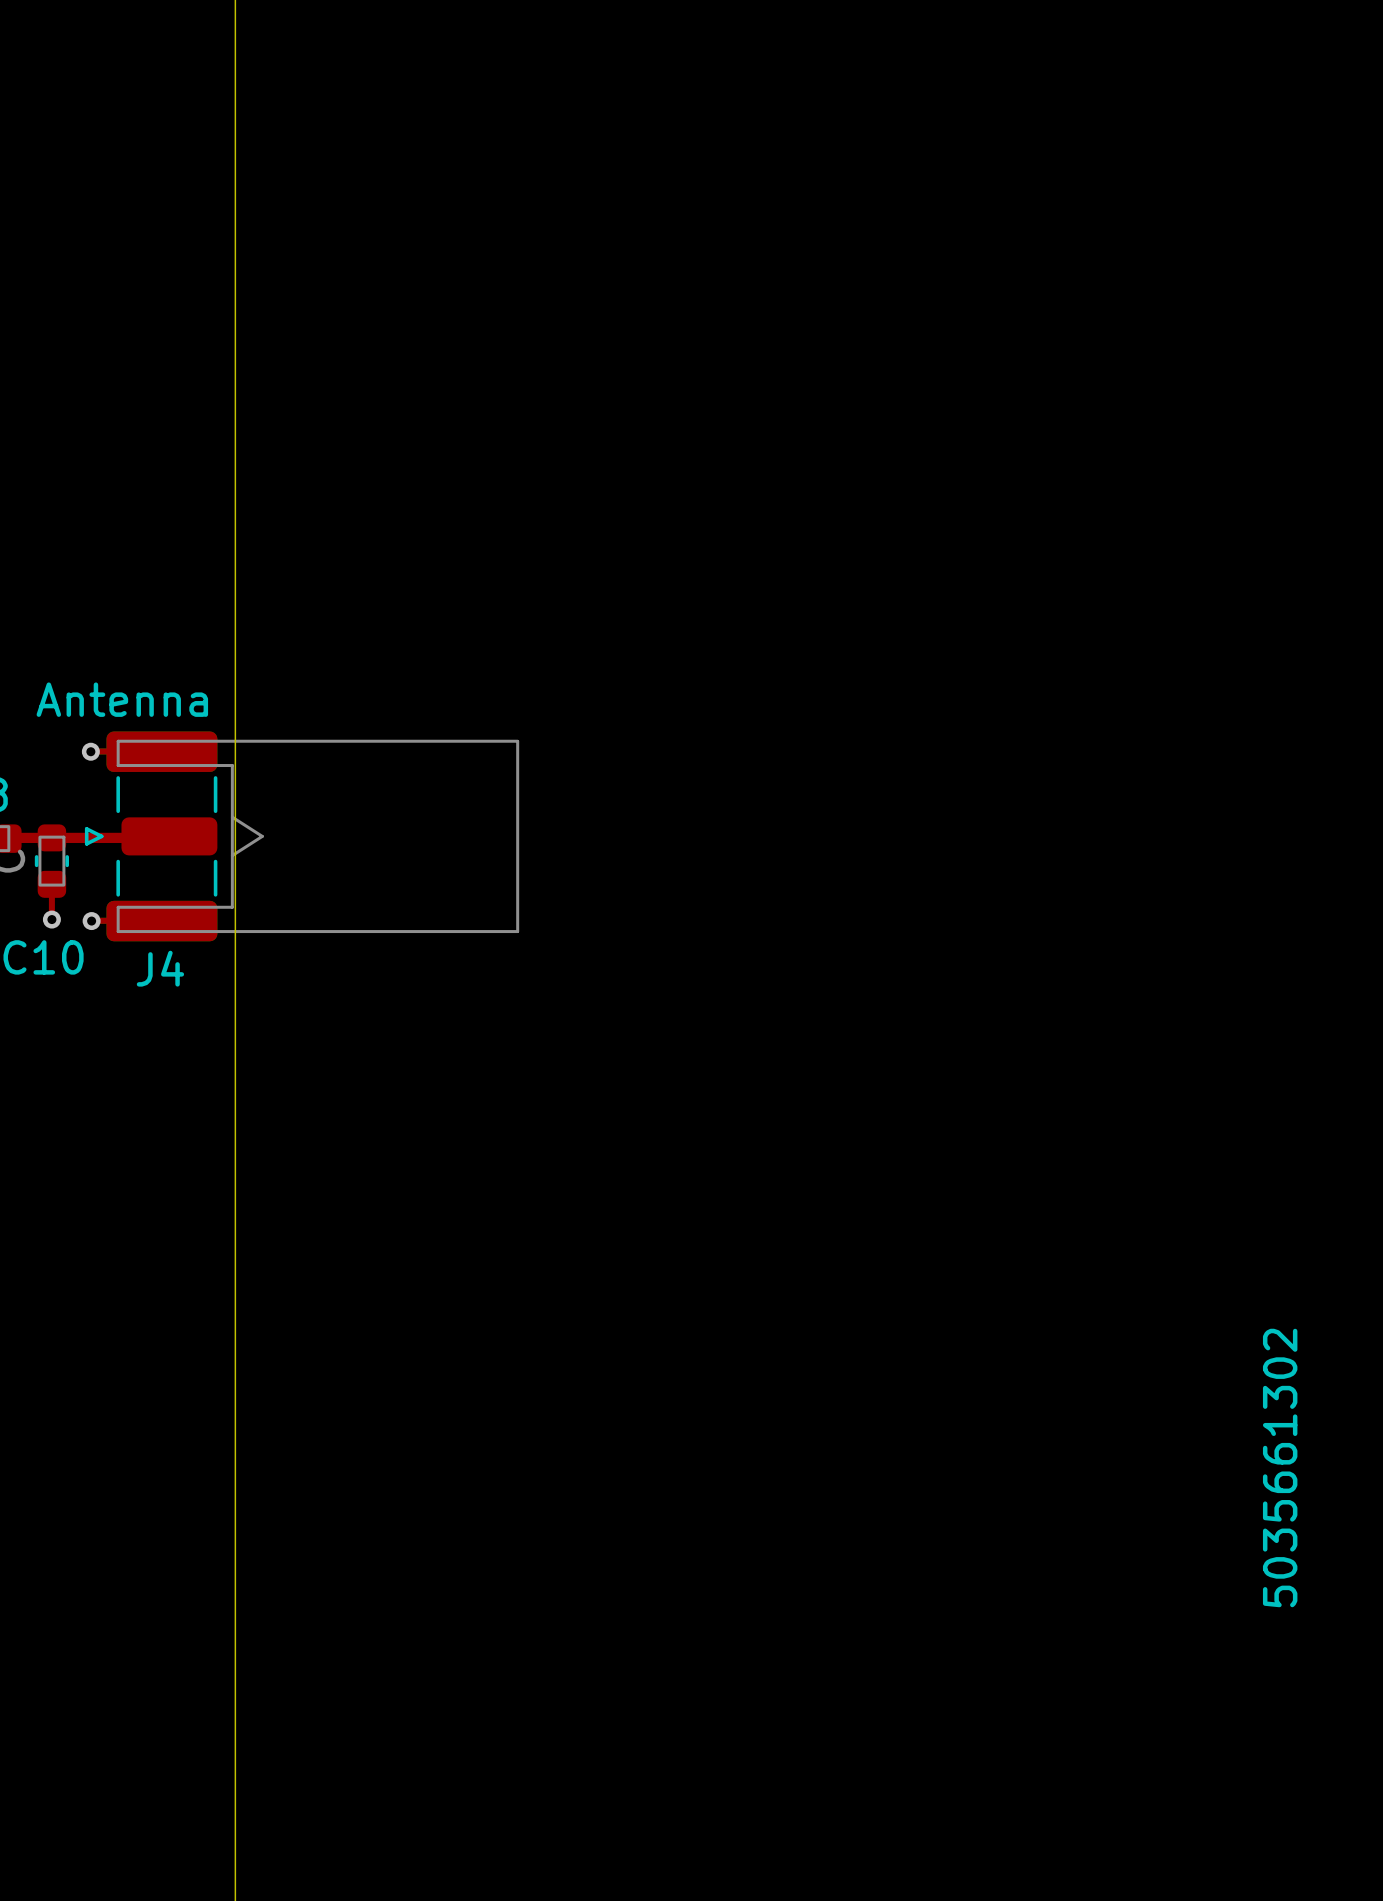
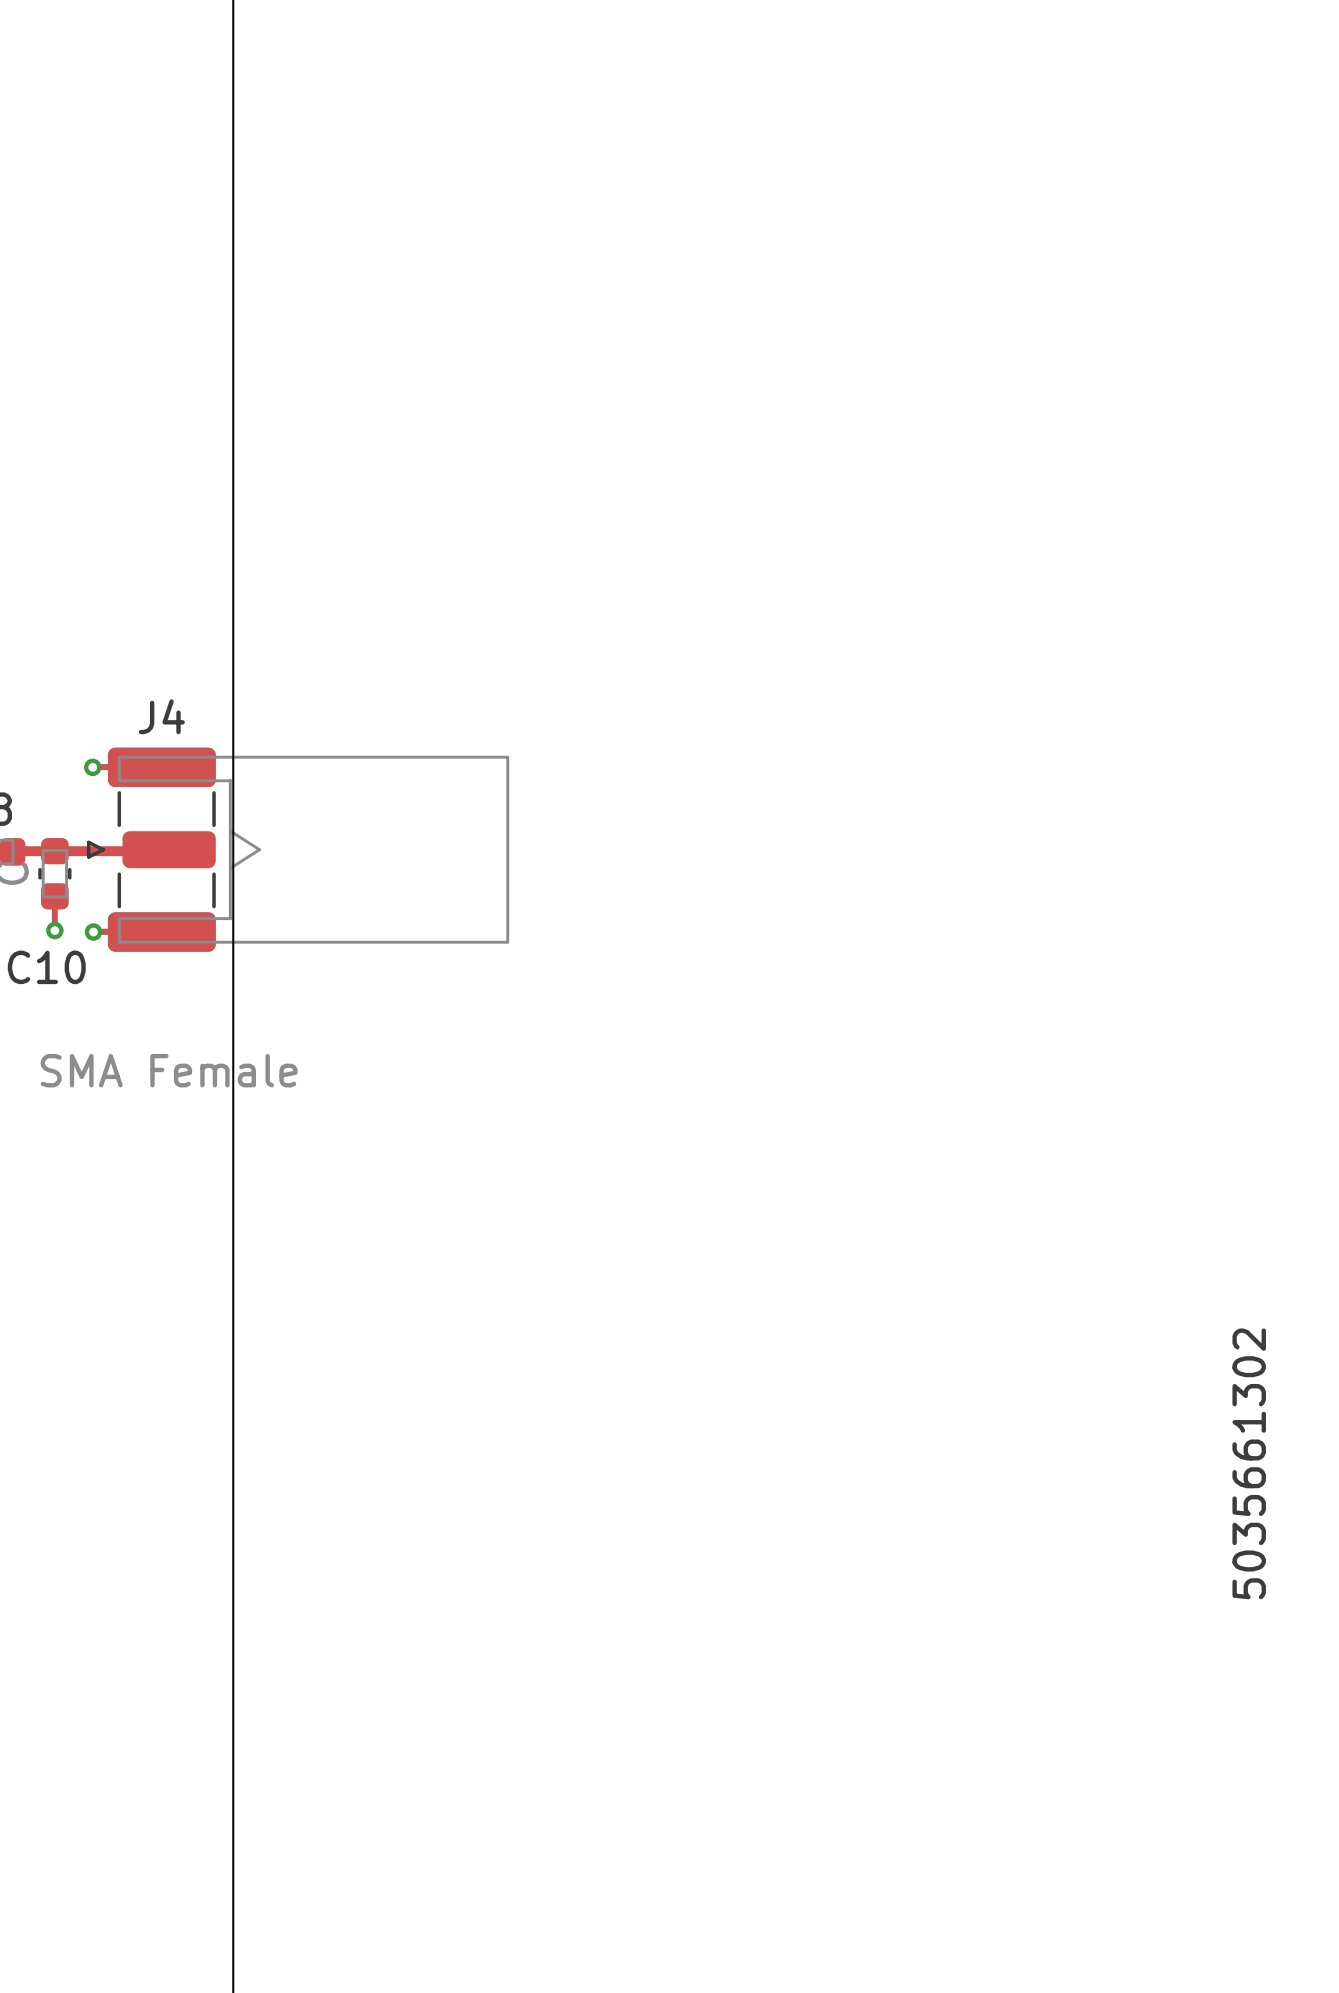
J4 value: Antenna (122, 699) -> SMA Female (169, 1070)
J4 name position: J4 (160, 968) -> J4 (161, 716)

